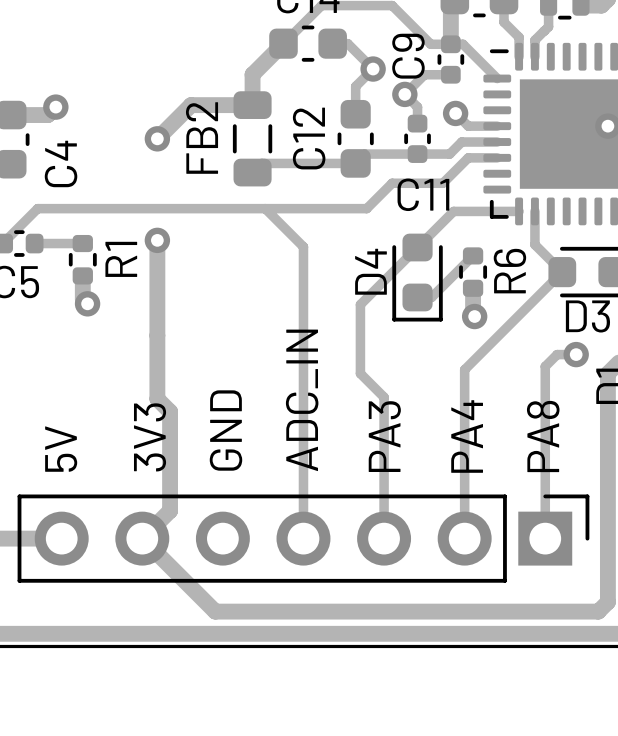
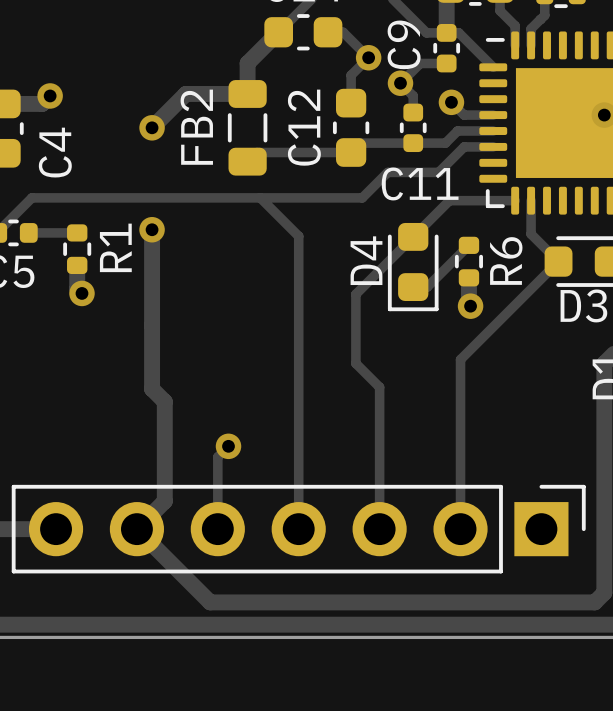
track: (576, 354) (557, 354) (545, 366) (545, 538) -> none
via: (576, 354) -> none
text: ADC_IN (302, 400) -> none
text: GND (225, 430) -> none
text: PA3 (384, 436) -> none
text: PA4 (467, 436) -> none
text: PA8 (543, 436) -> none
text: 3V3 (150, 437) -> none
text: 5V (61, 449) -> none
track: none -> (228, 446) (217, 456) (217, 529)
via: none -> (228, 446)

